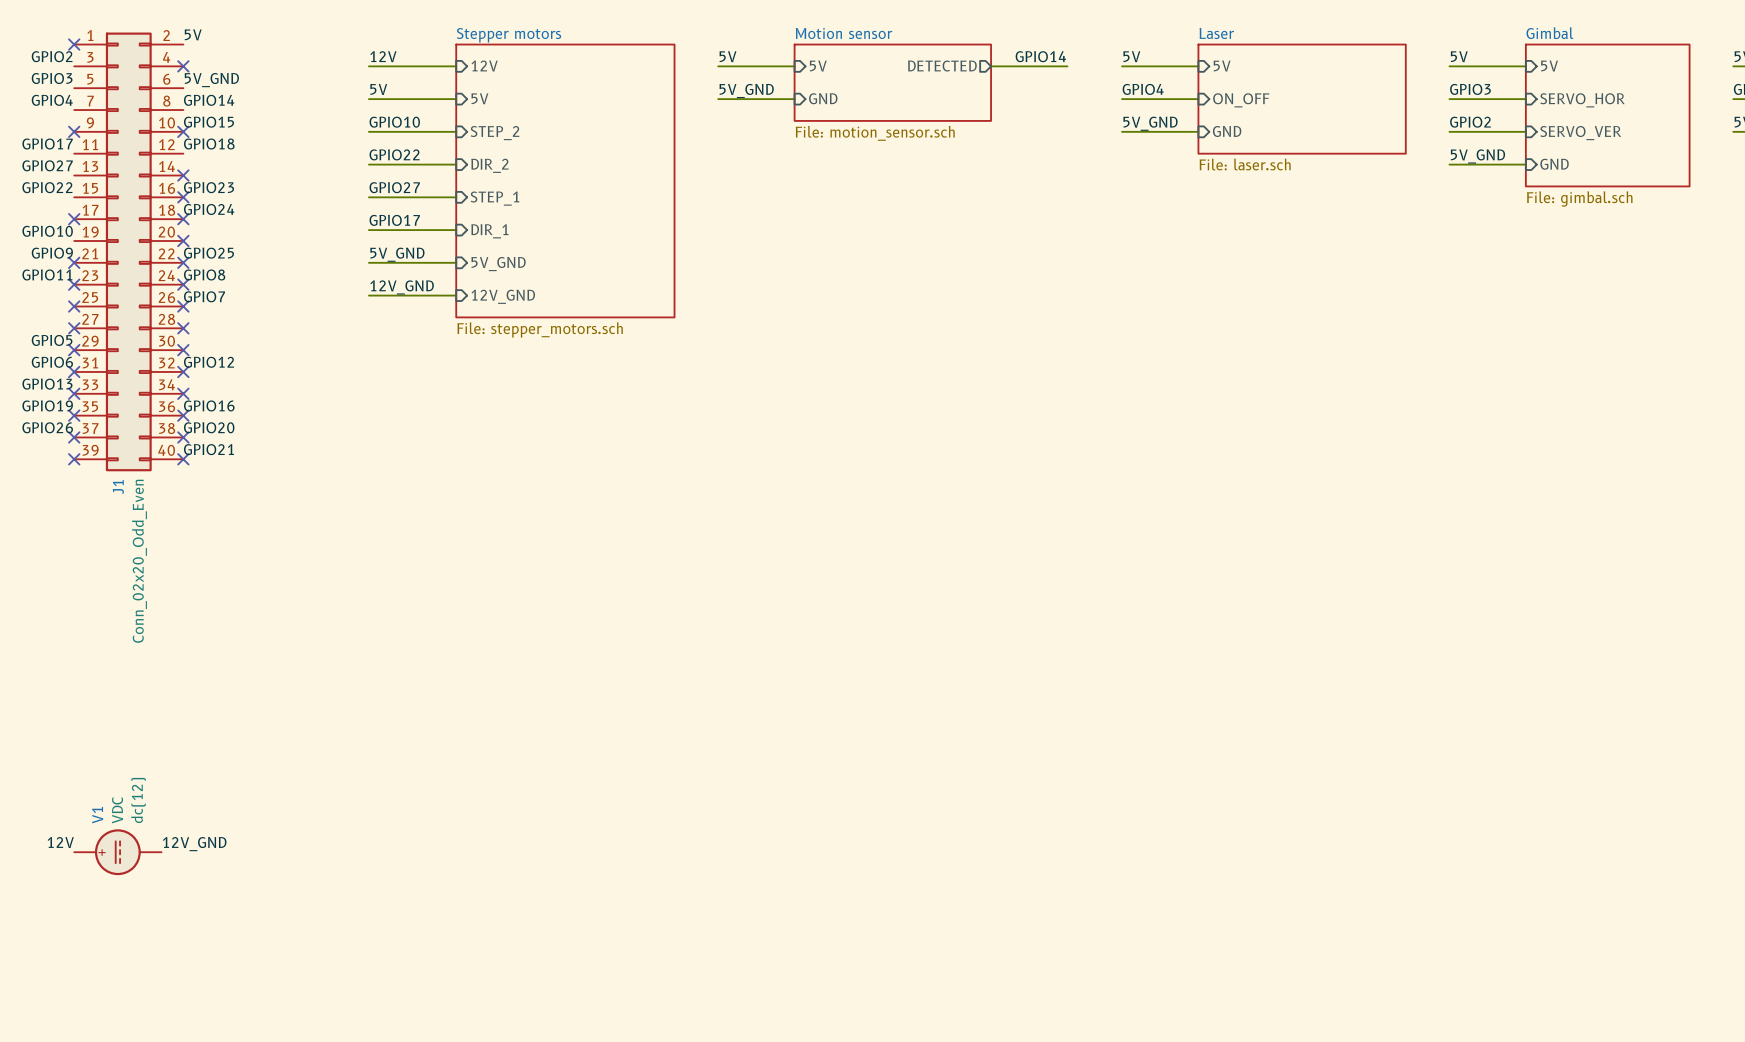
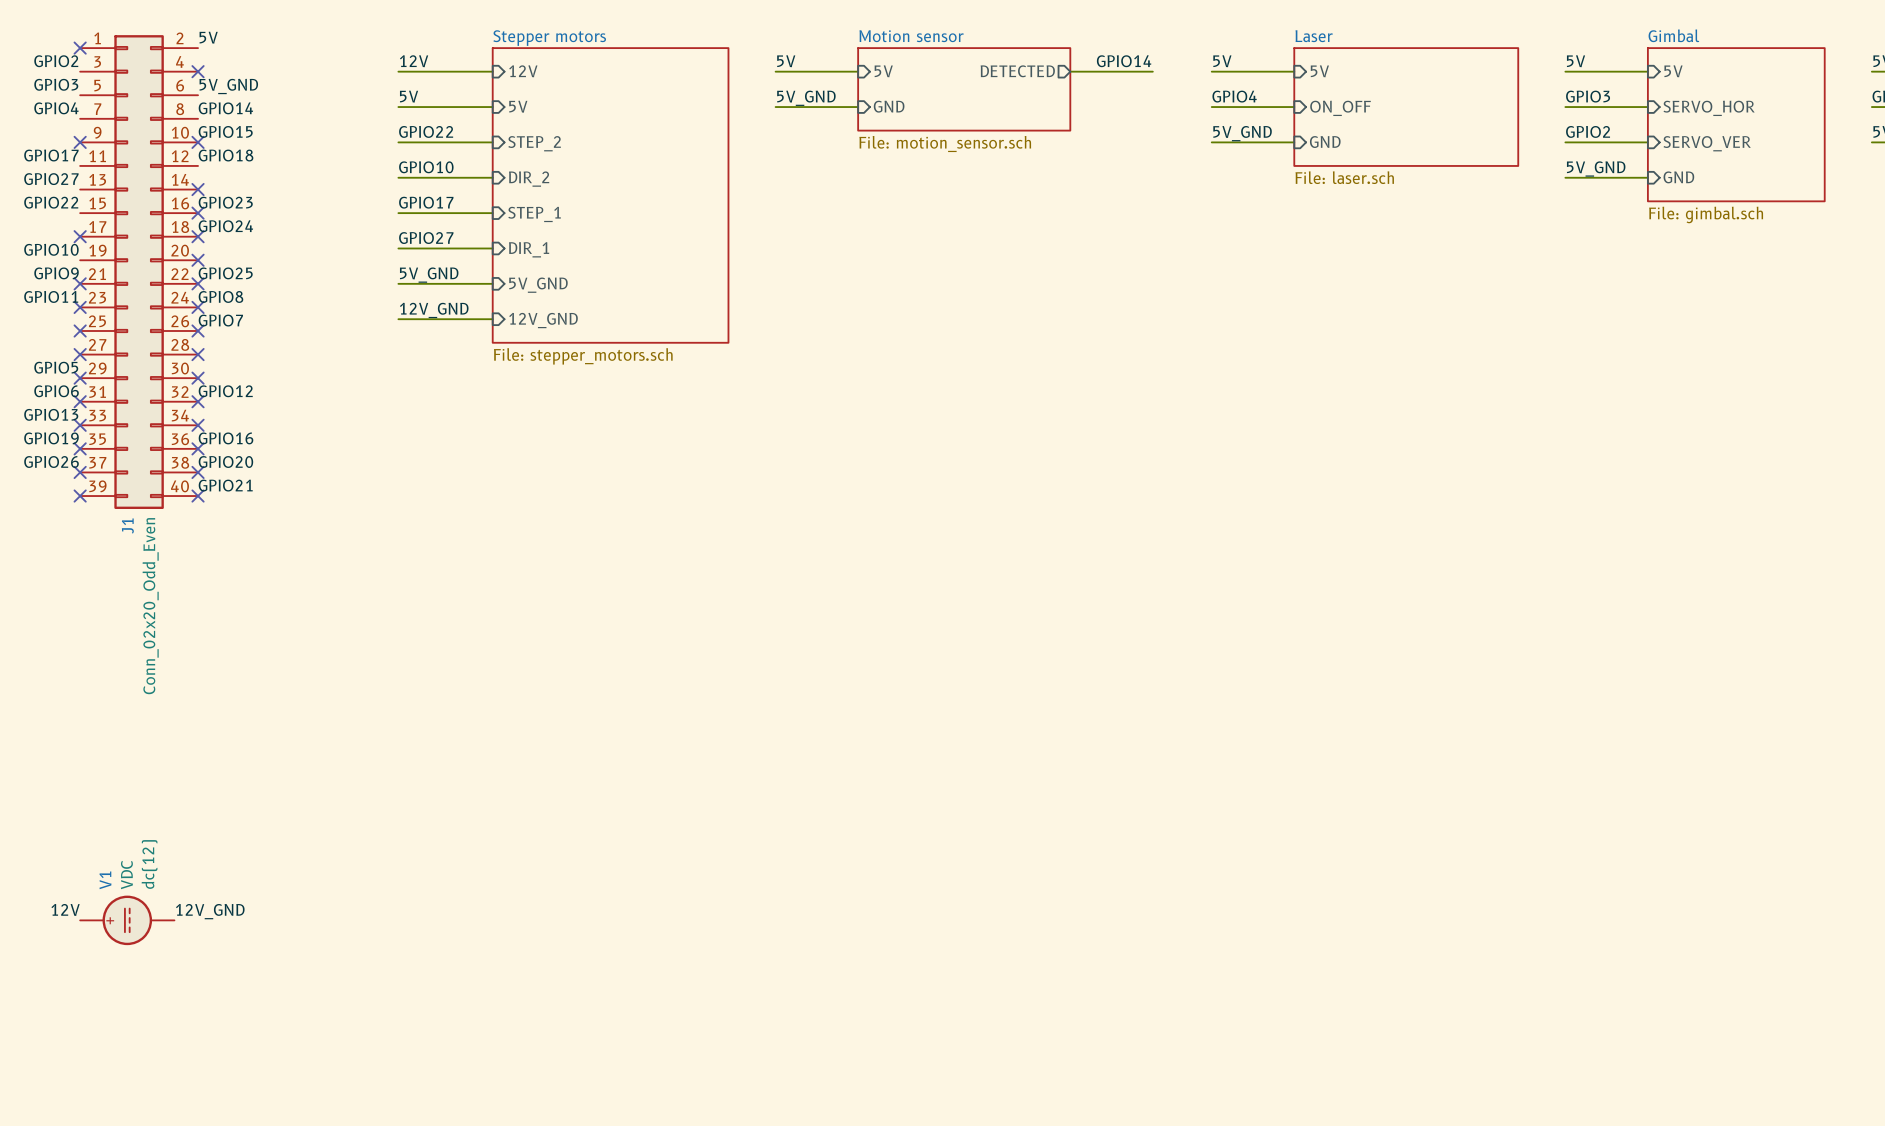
label: GPIO10 (394, 122) -> GPIO22 (426, 131)
label: GPIO22 (394, 154) -> GPIO10 (426, 167)
label: GPIO27 (394, 187) -> GPIO17 (426, 202)
label: GPIO17 (394, 220) -> GPIO27 (426, 238)

